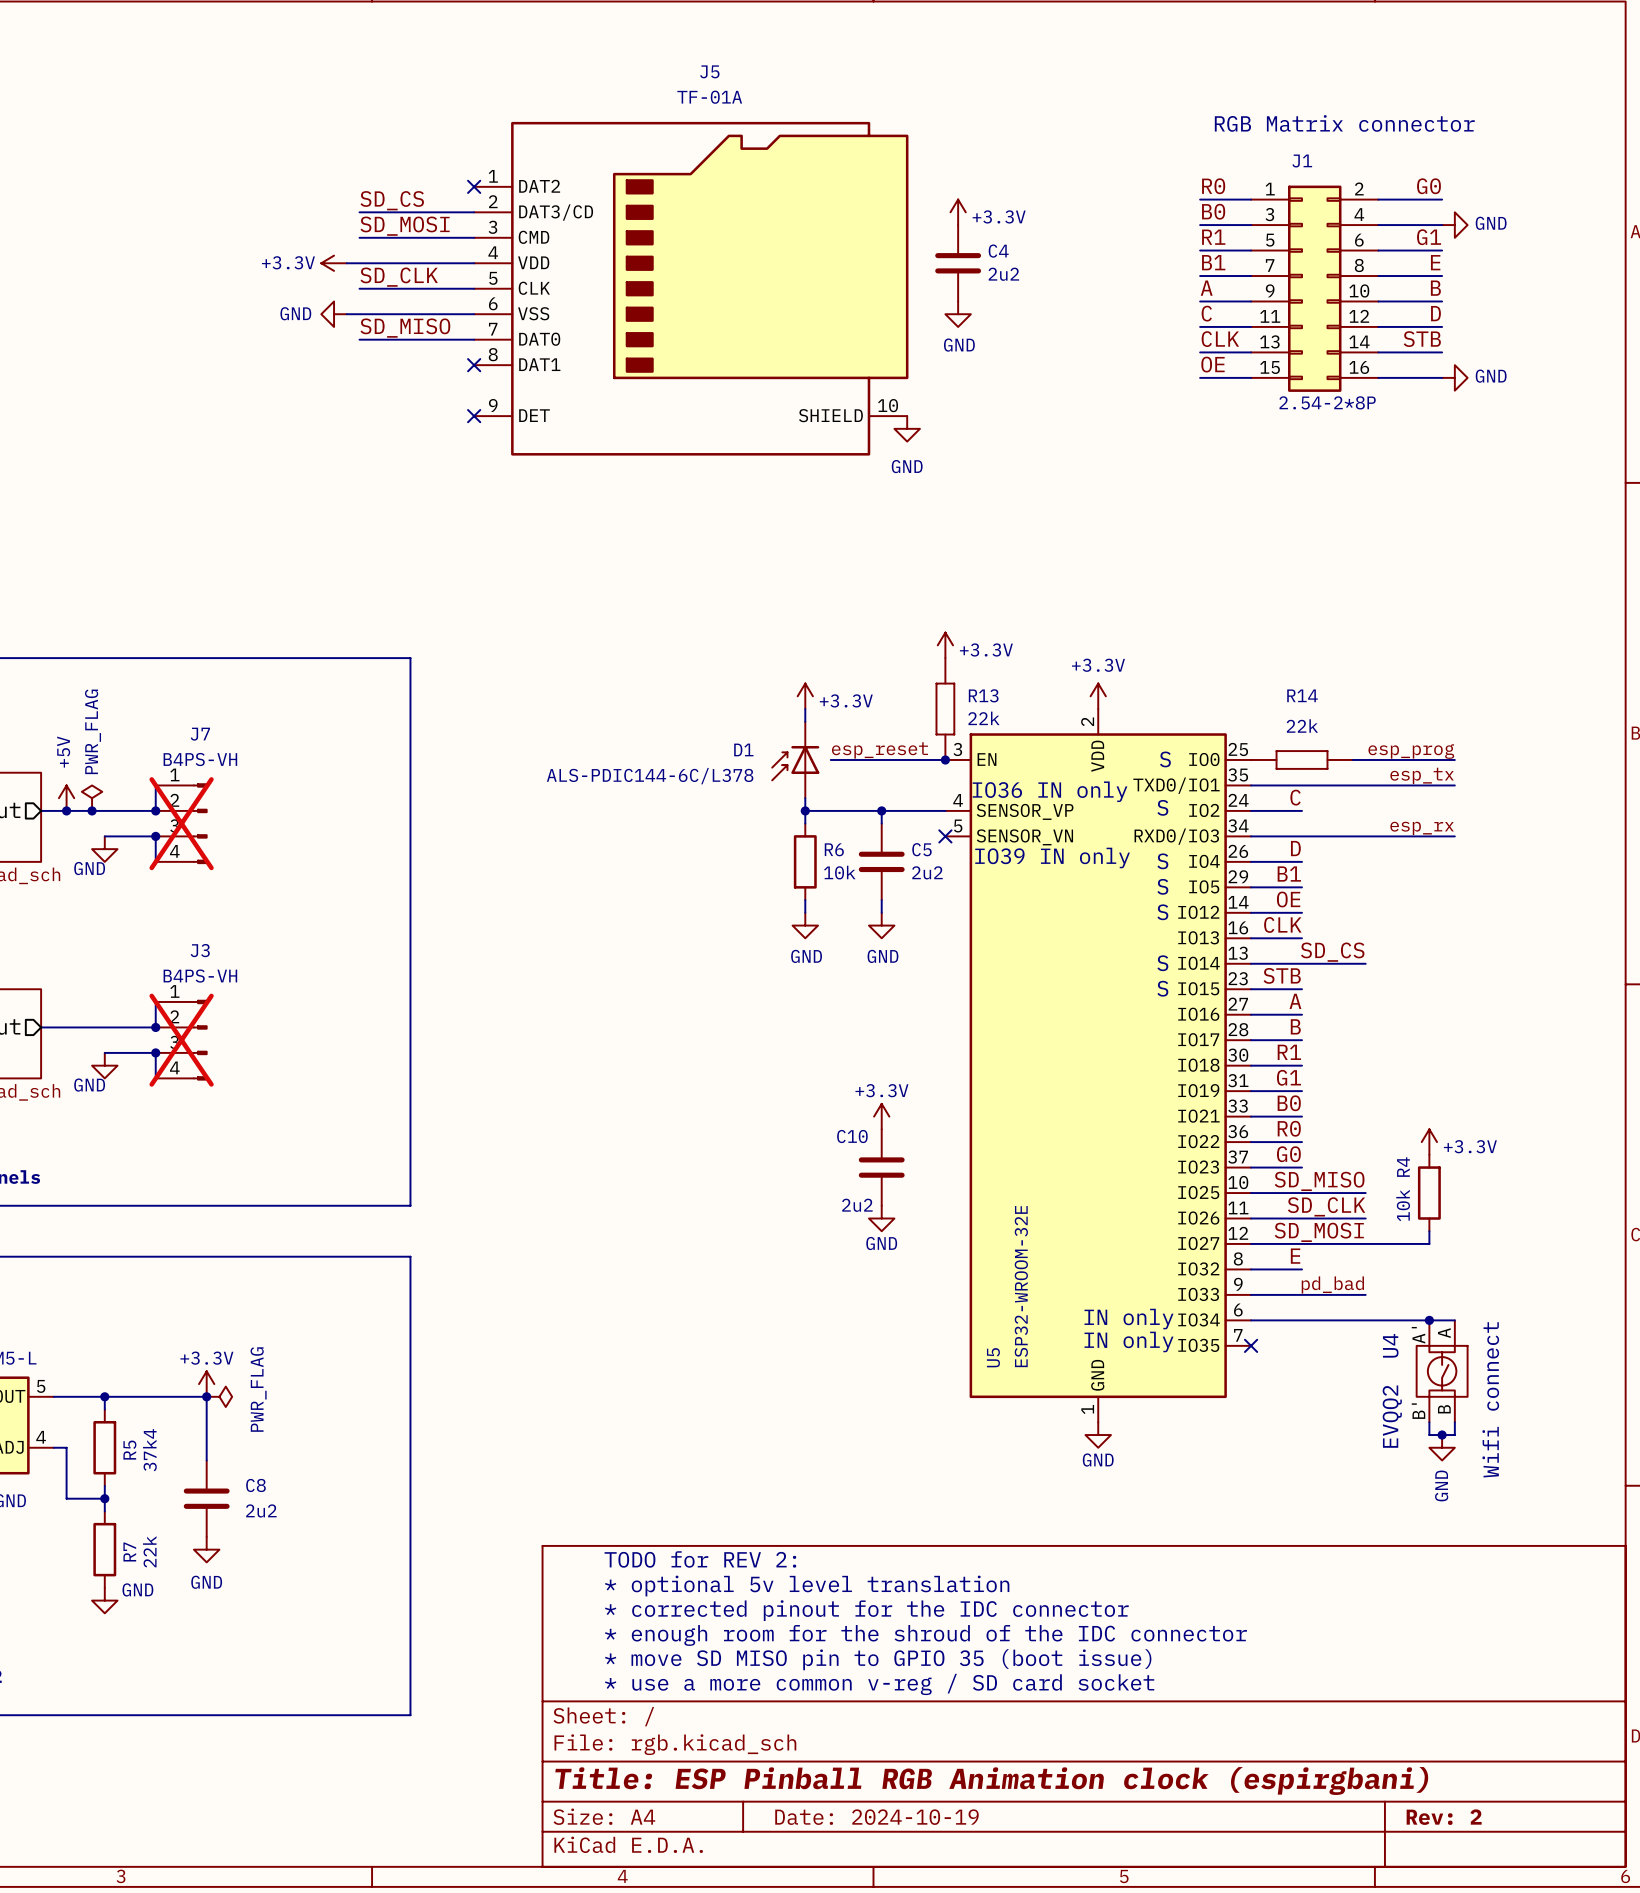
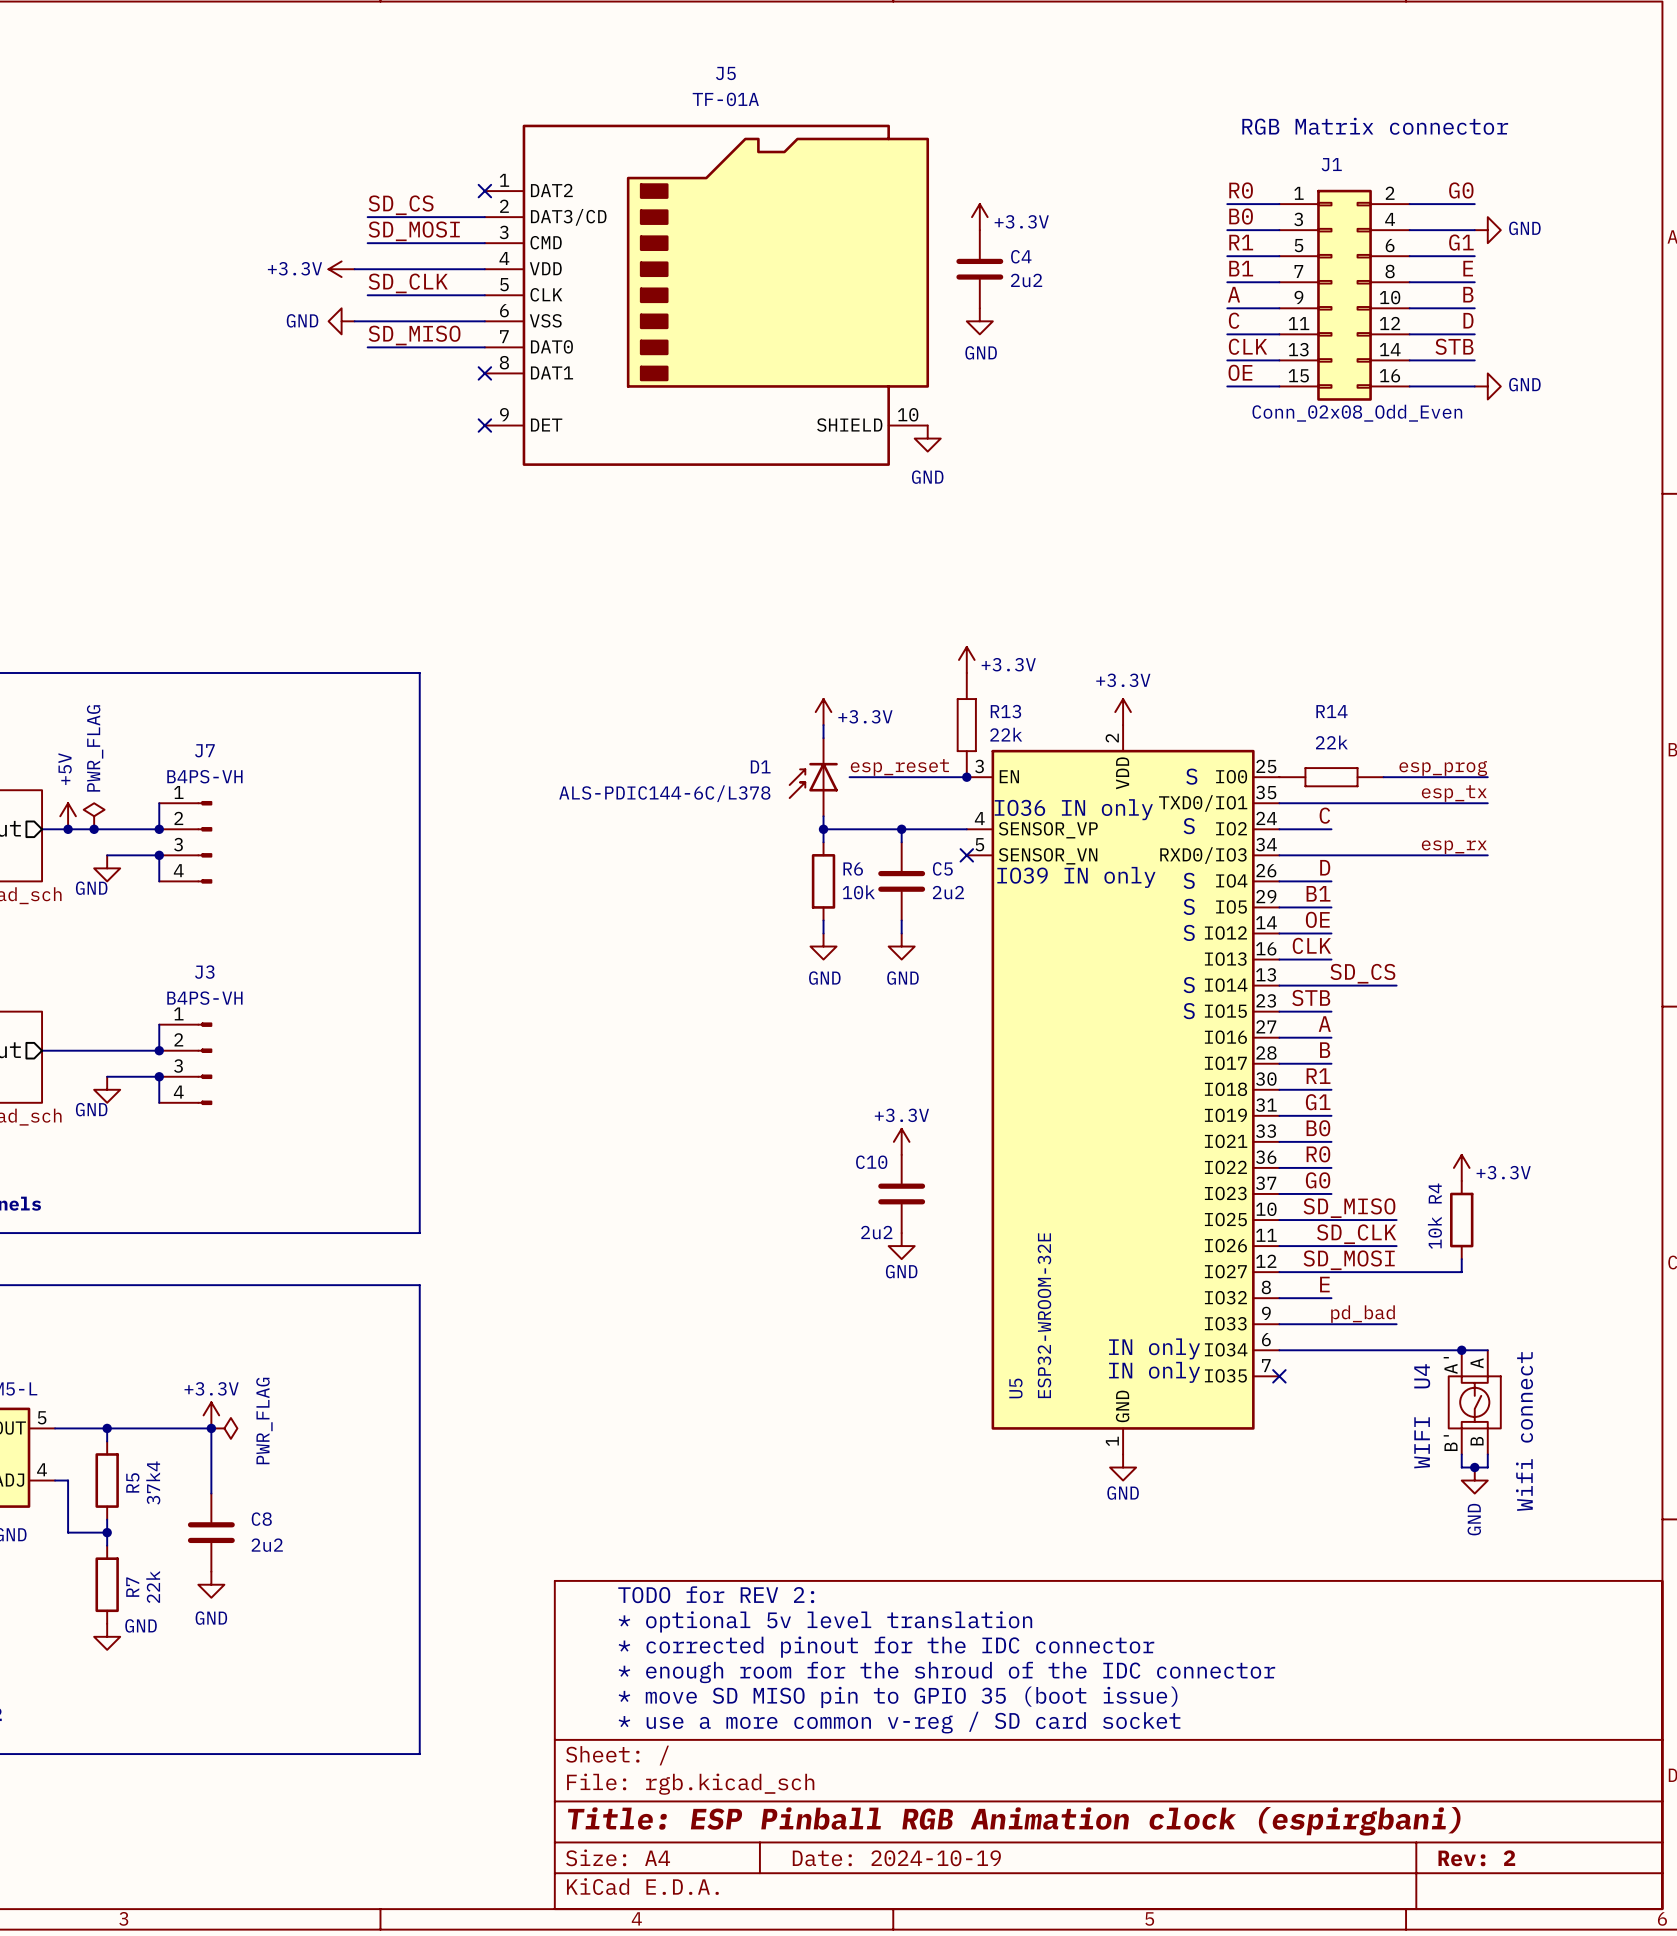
J1 value: 2.54-2*8P (1327, 402) -> Conn_02x08_Odd_Even (1357, 413)
J7 do-not-place cross: (181, 823) -> none
J3 do-not-place cross: (181, 1040) -> none
U4 value: EVQQ2 (1392, 1416) -> WIFI (1422, 1442)

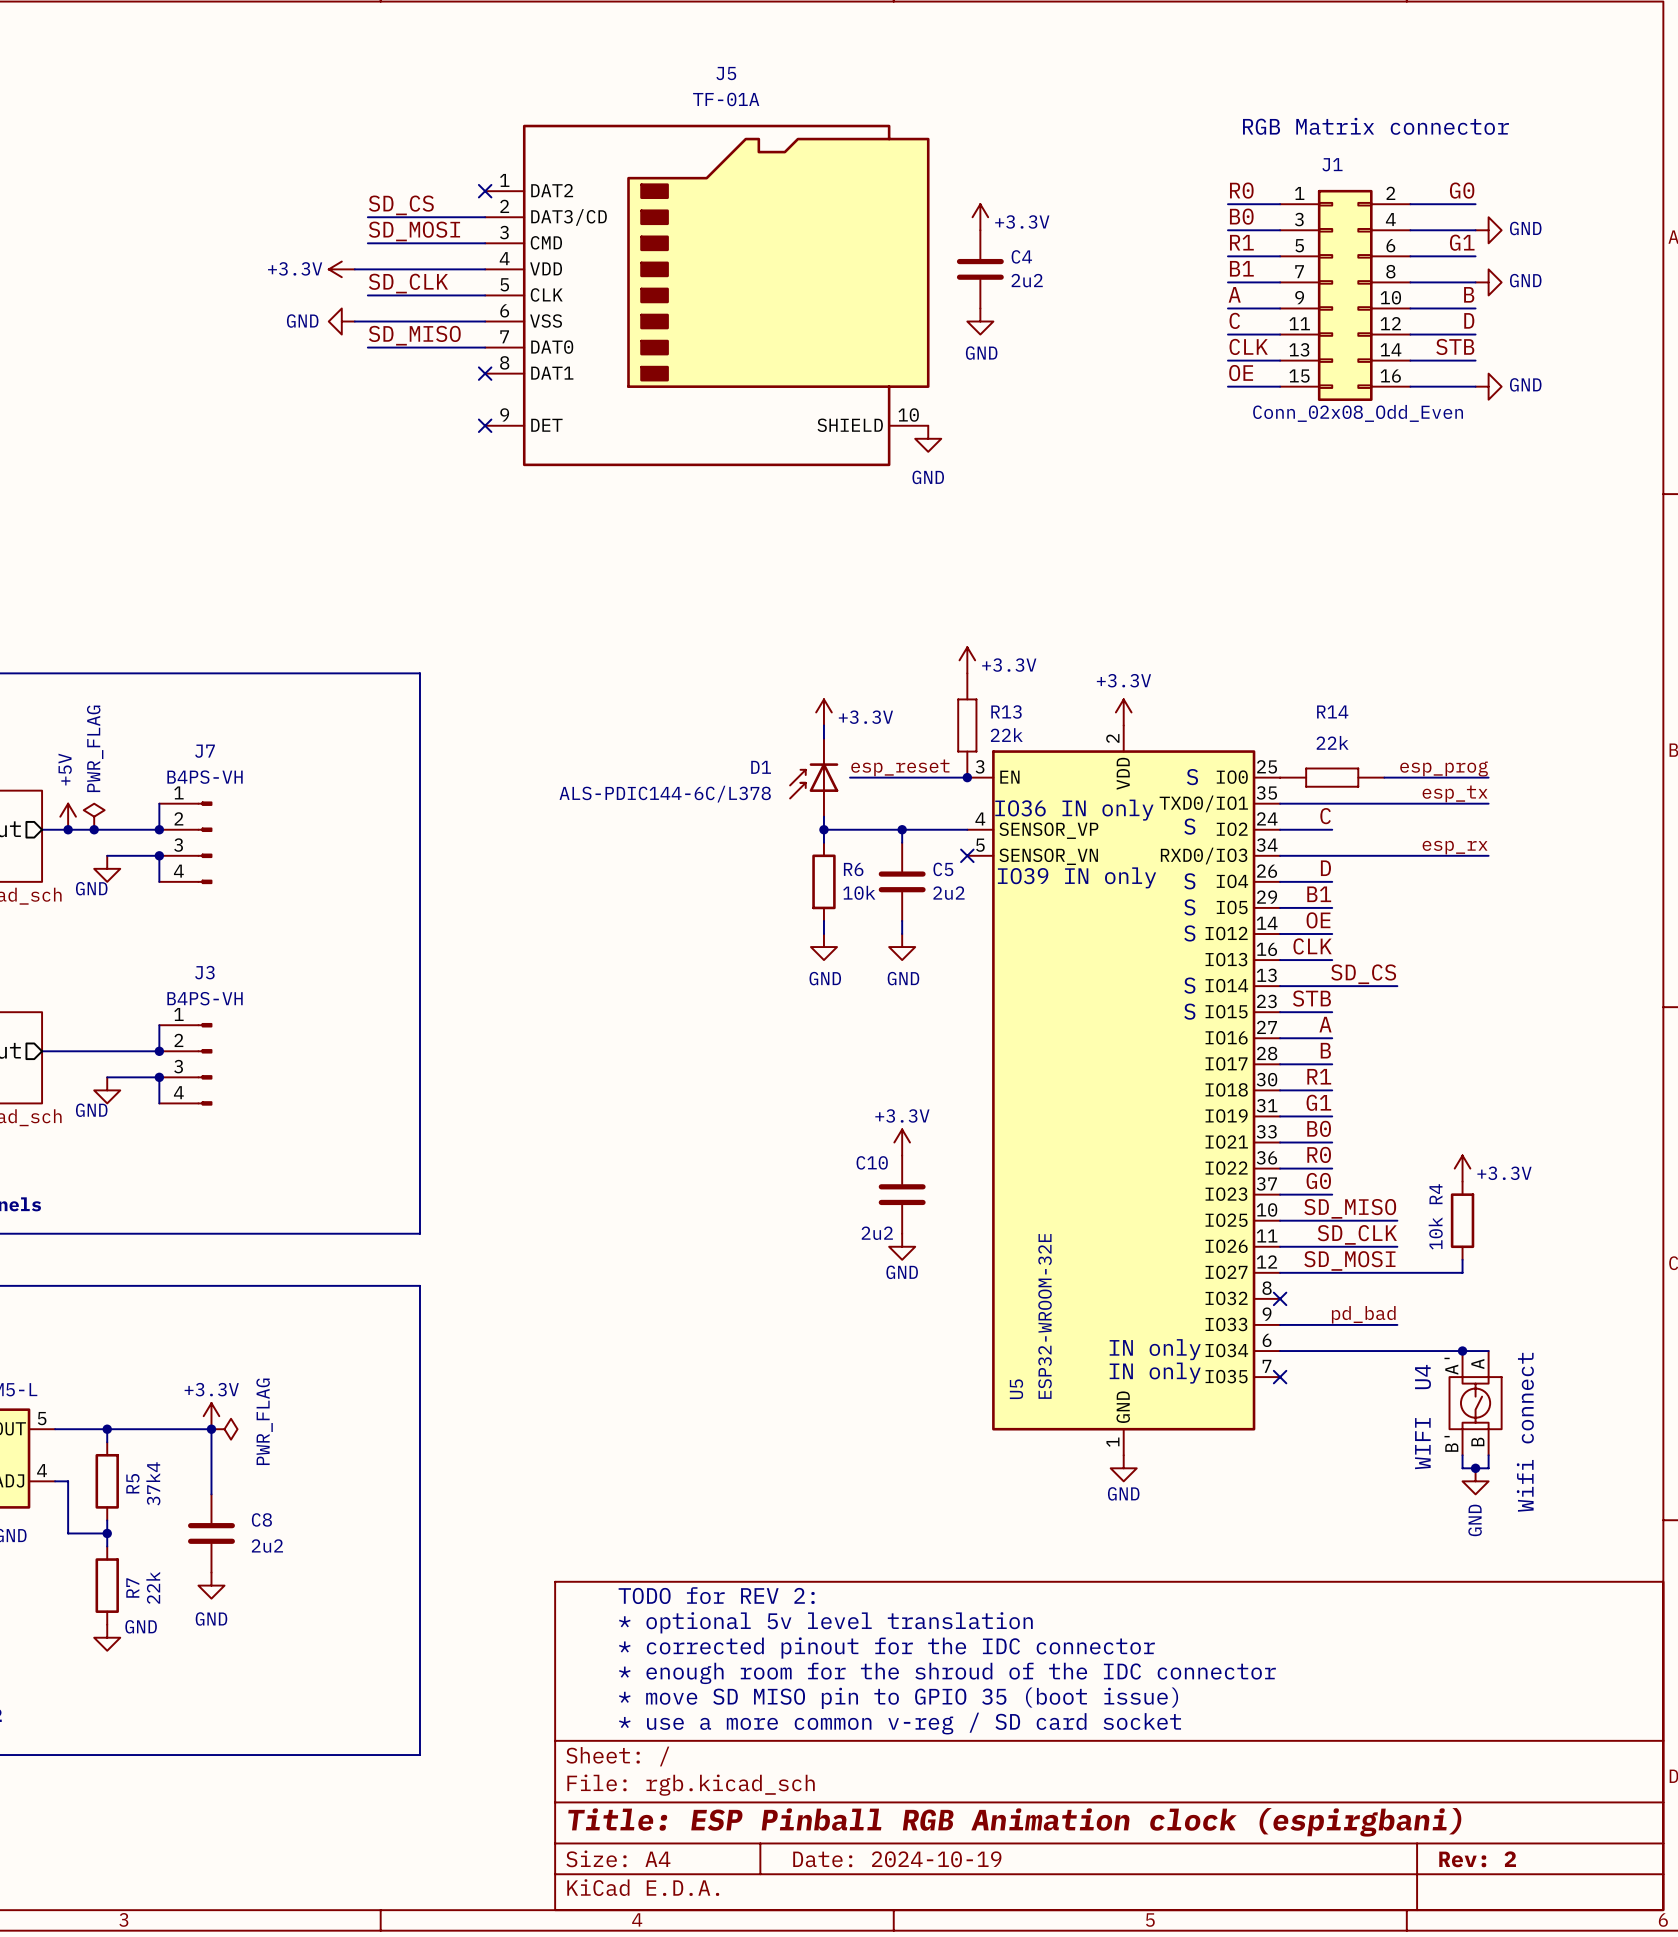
label: E (1468, 268) -> none
power symbol: none -> GND (1488, 282)
label: E (1324, 1284) -> none
wire: (1279, 1298) (1331, 1298) -> none
no-connect mark: none -> (1280, 1298)

